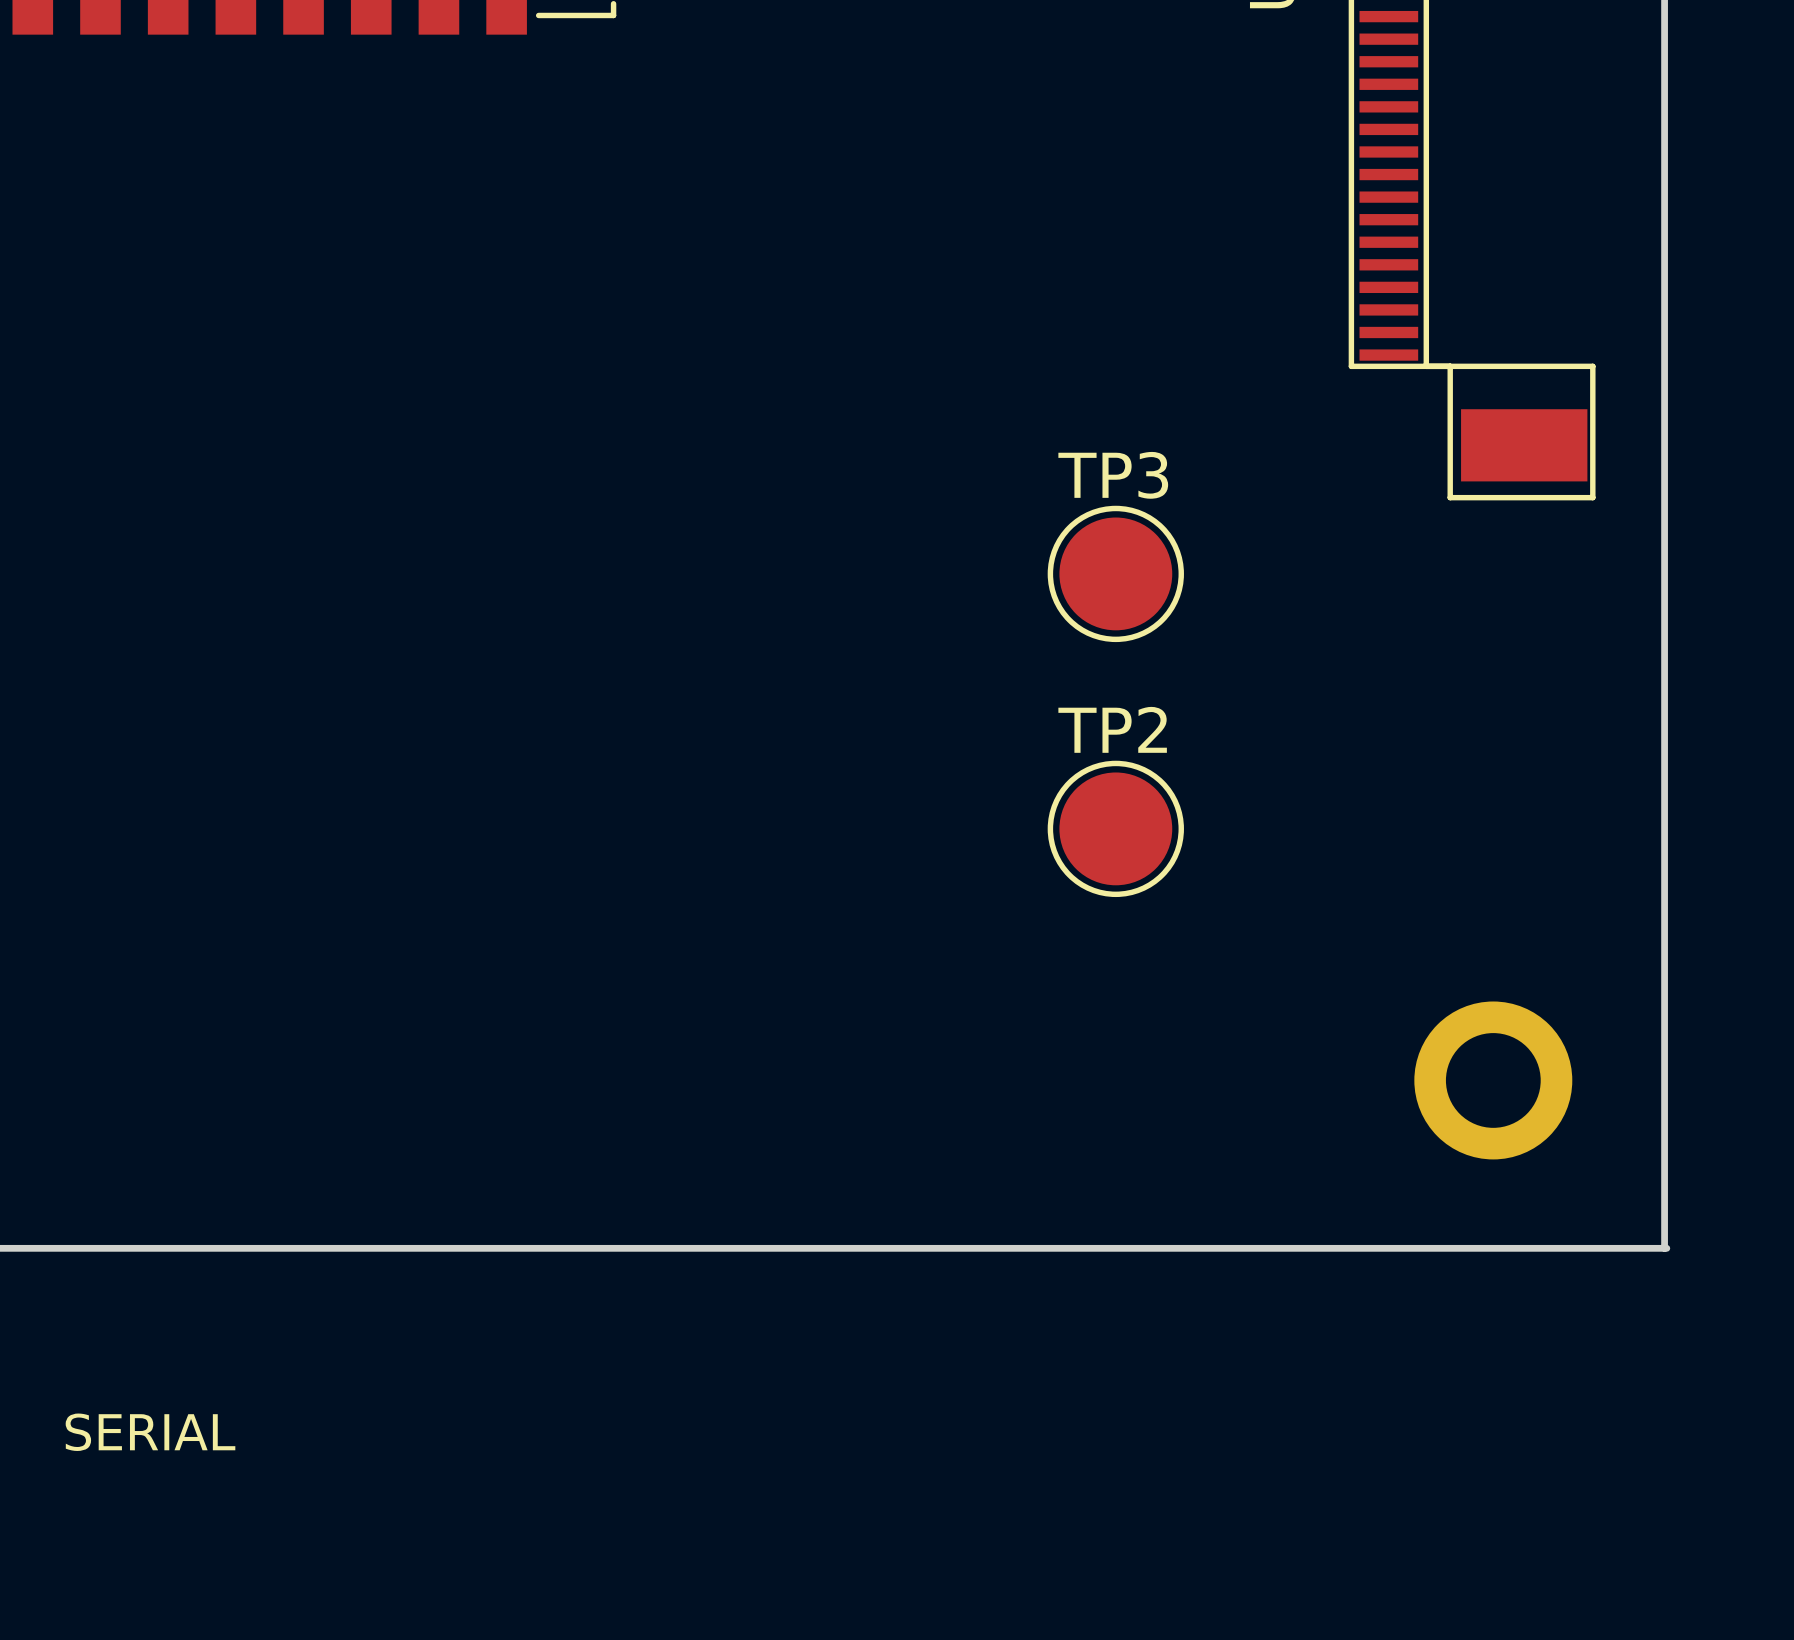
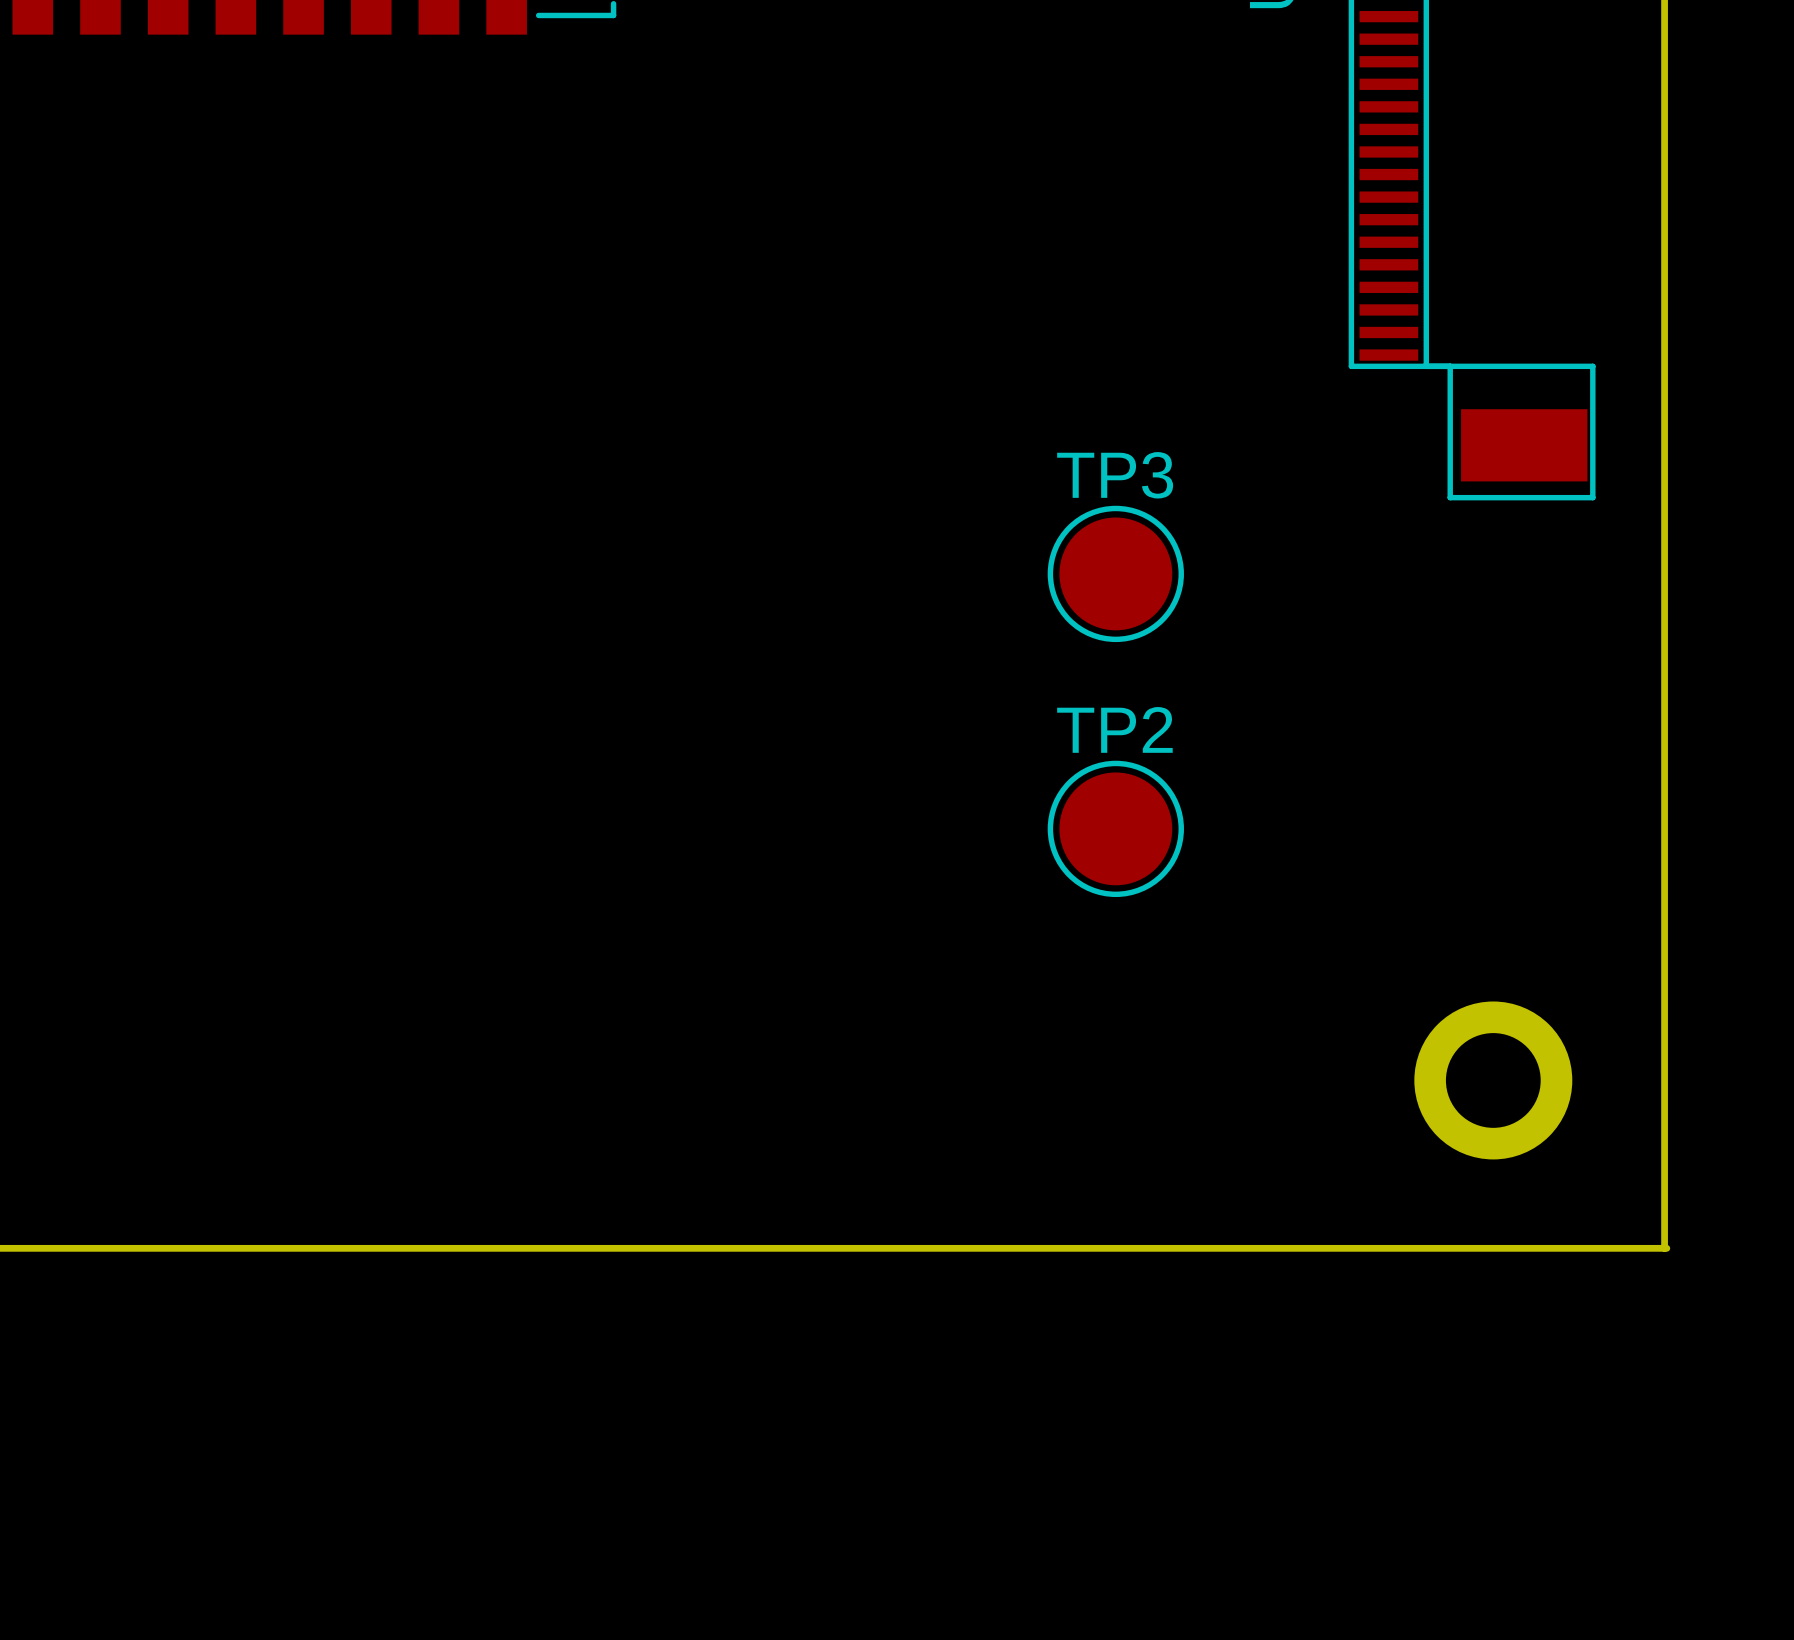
text: SERIAL (150, 1432) -> none

